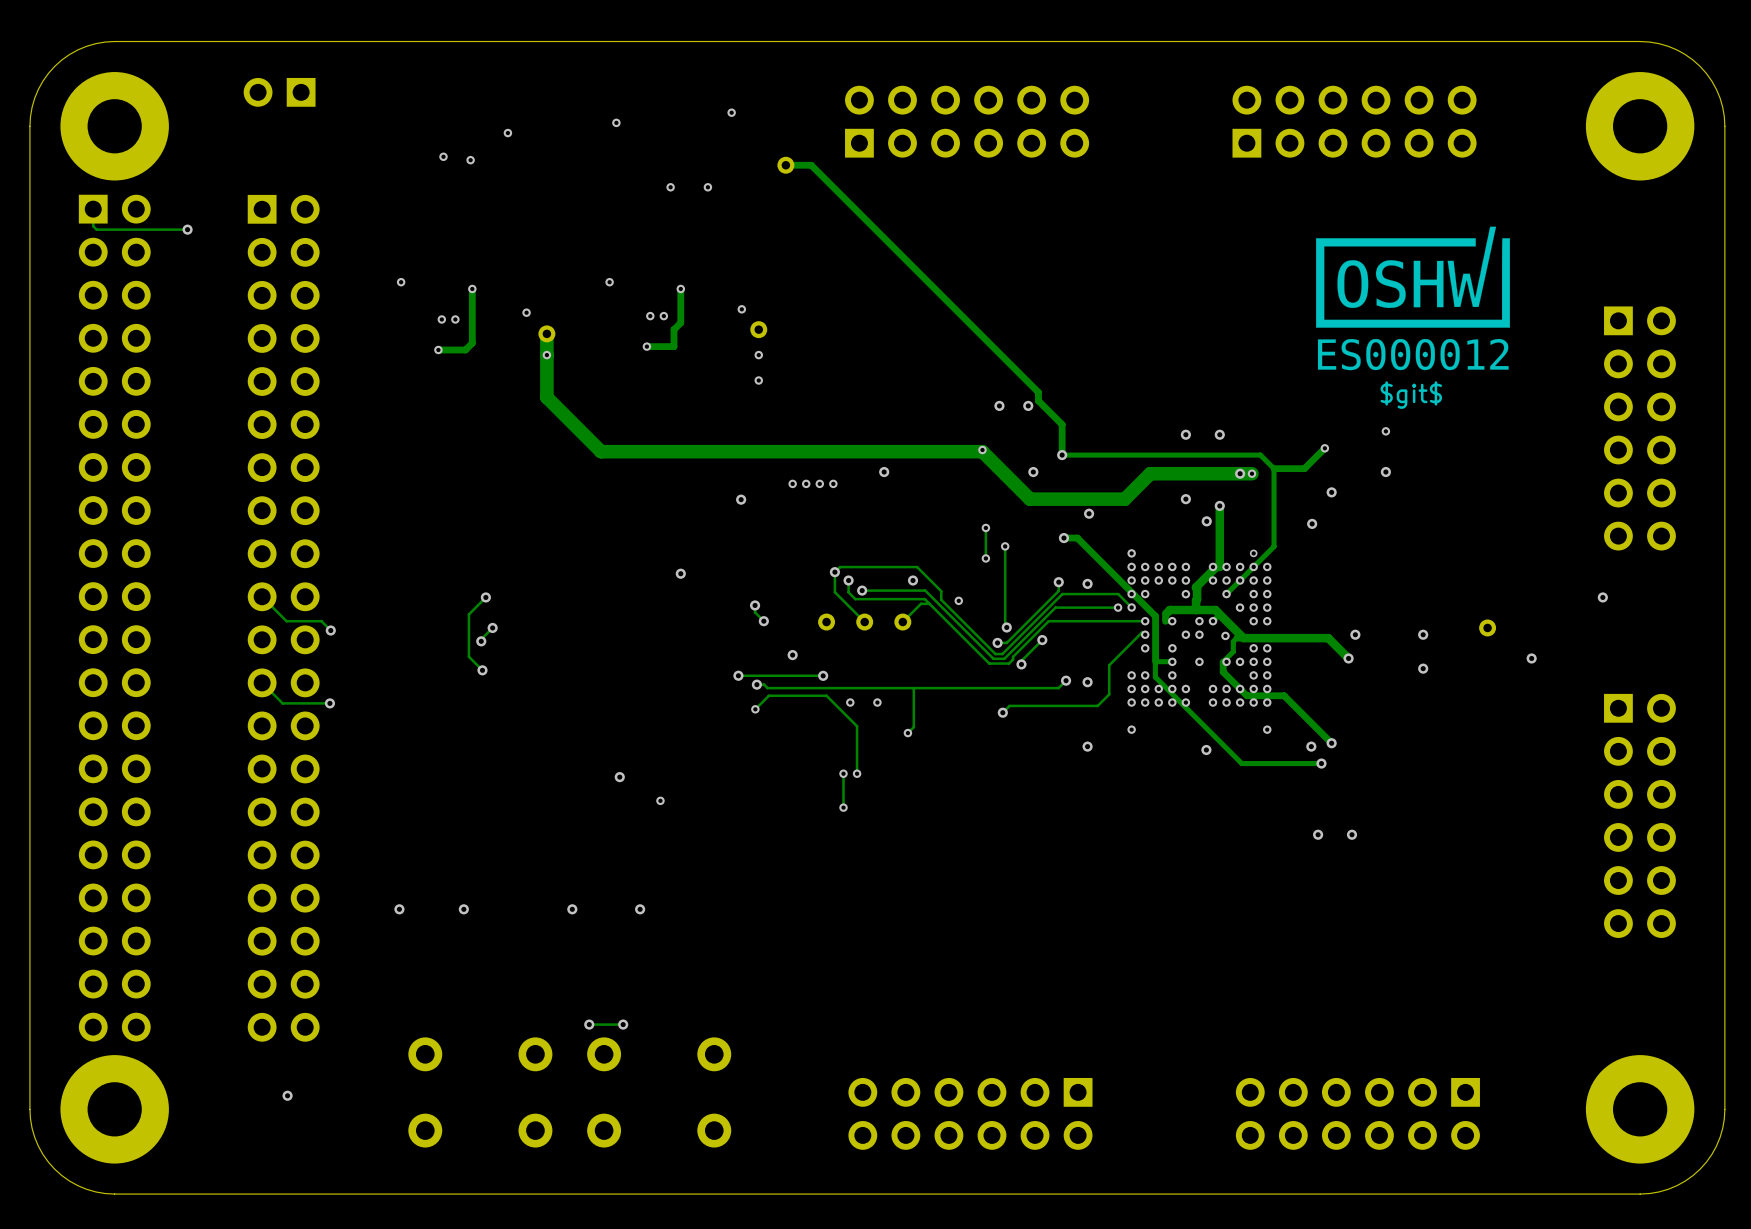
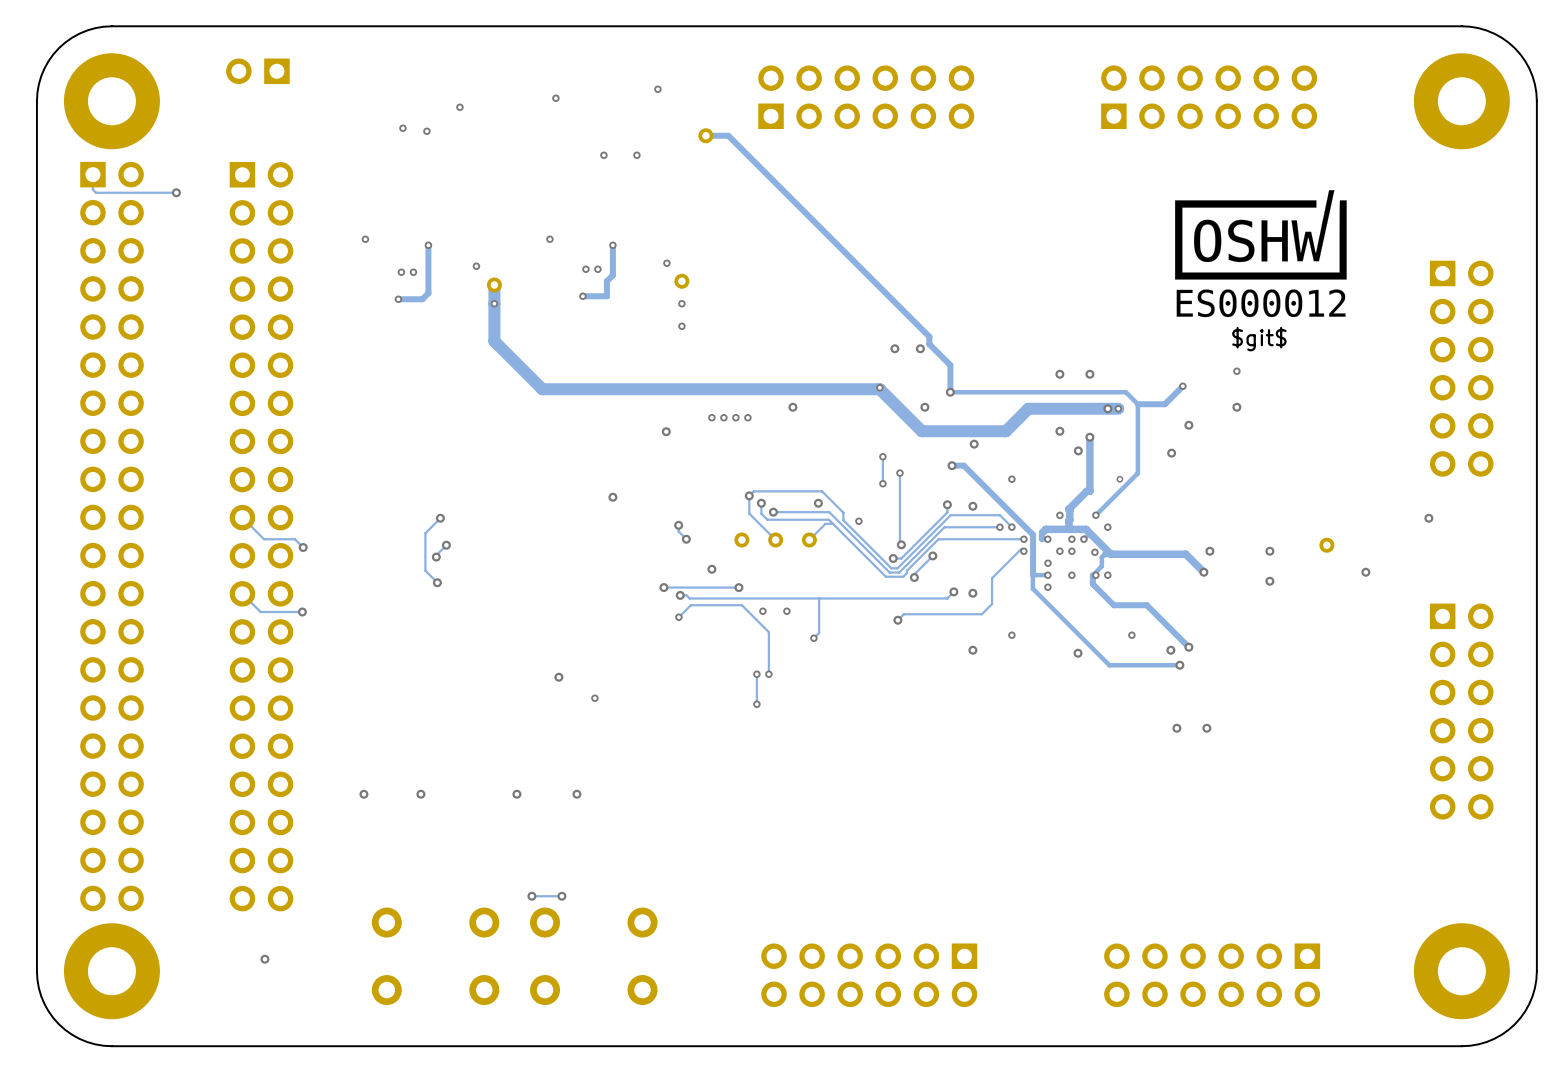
via: (1131, 566) -> none
via: (1145, 566) -> none
via: (1158, 566) -> none
via: (1172, 566) -> none
via: (1185, 566) -> none
via: (1213, 566) -> none
via: (1226, 566) -> none
via: (1240, 566) -> none
via: (1253, 566) -> none
via: (1267, 566) -> none
via: (1131, 580) -> none
via: (1145, 580) -> none
via: (1158, 580) -> none
via: (1172, 580) -> none
via: (1185, 580) -> none
via: (1213, 580) -> none
via: (1226, 580) -> none
via: (1240, 580) -> none
via: (1253, 580) -> none
via: (1267, 580) -> none
via: (1131, 594) -> none
via: (1145, 594) -> none
via: (1253, 594) -> none
via: (1267, 594) -> none
via: (1253, 607) -> none
via: (1267, 607) -> none
via: (1253, 621) -> none
via: (1267, 621) -> none
via: (1145, 648) -> none
via: (1253, 648) -> none
via: (1267, 648) -> none
via: (1253, 661) -> none
via: (1267, 661) -> none
via: (1131, 675) -> none
via: (1145, 675) -> none
via: (1253, 675) -> none
via: (1267, 675) -> none
via: (1131, 688) -> none
via: (1145, 688) -> none
via: (1158, 688) -> none
via: (1172, 688) -> none
via: (1185, 688) -> none
via: (1213, 688) -> none
via: (1226, 688) -> none
via: (1240, 688) -> none
via: (1253, 688) -> none
via: (1267, 688) -> none
via: (1131, 702) -> none
via: (1145, 702) -> none
via: (1158, 702) -> none
via: (1172, 702) -> none
via: (1185, 702) -> none
via: (1213, 702) -> none
via: (1226, 702) -> none
via: (1240, 702) -> none
via: (1253, 702) -> none
via: (1267, 702) -> none

